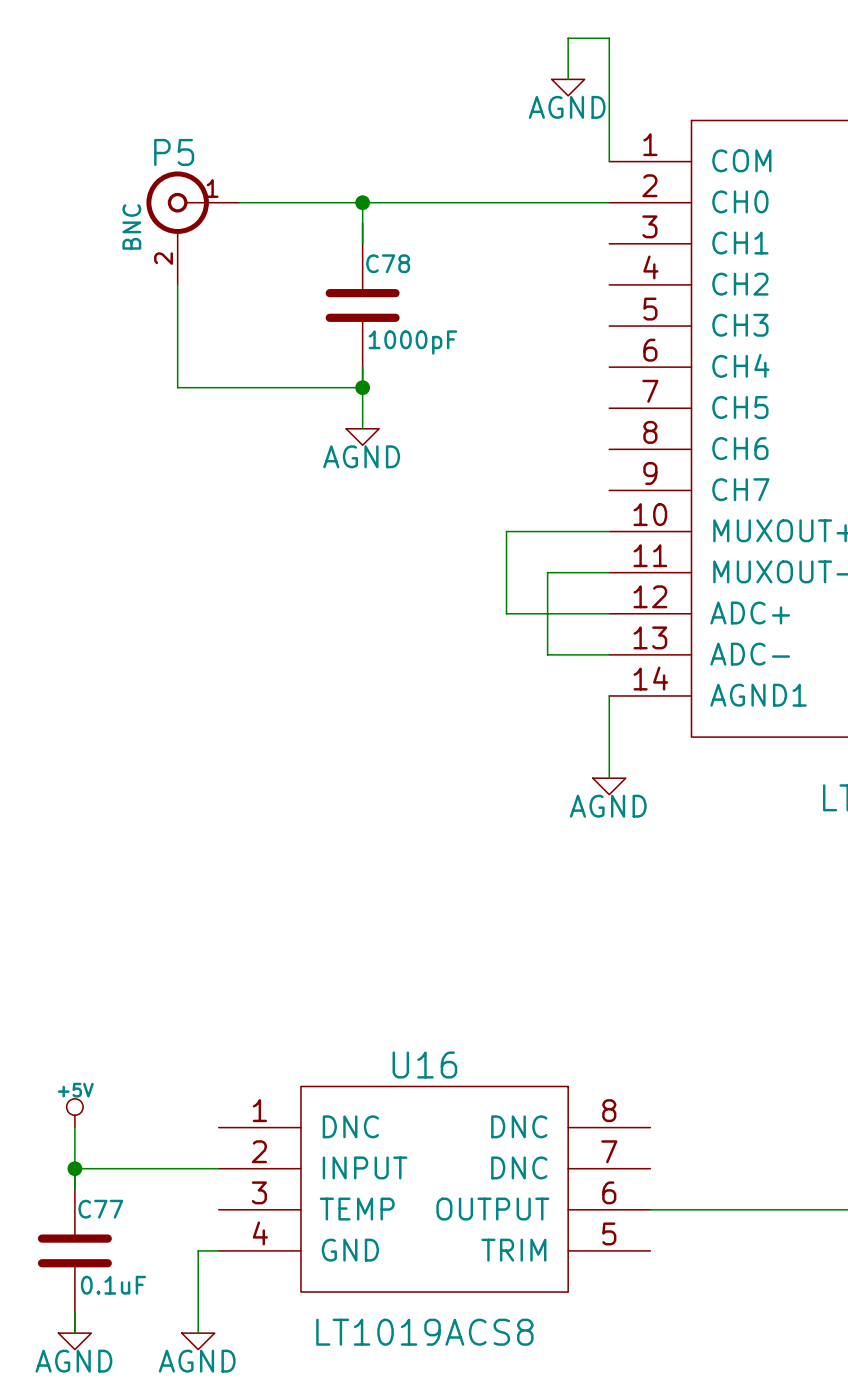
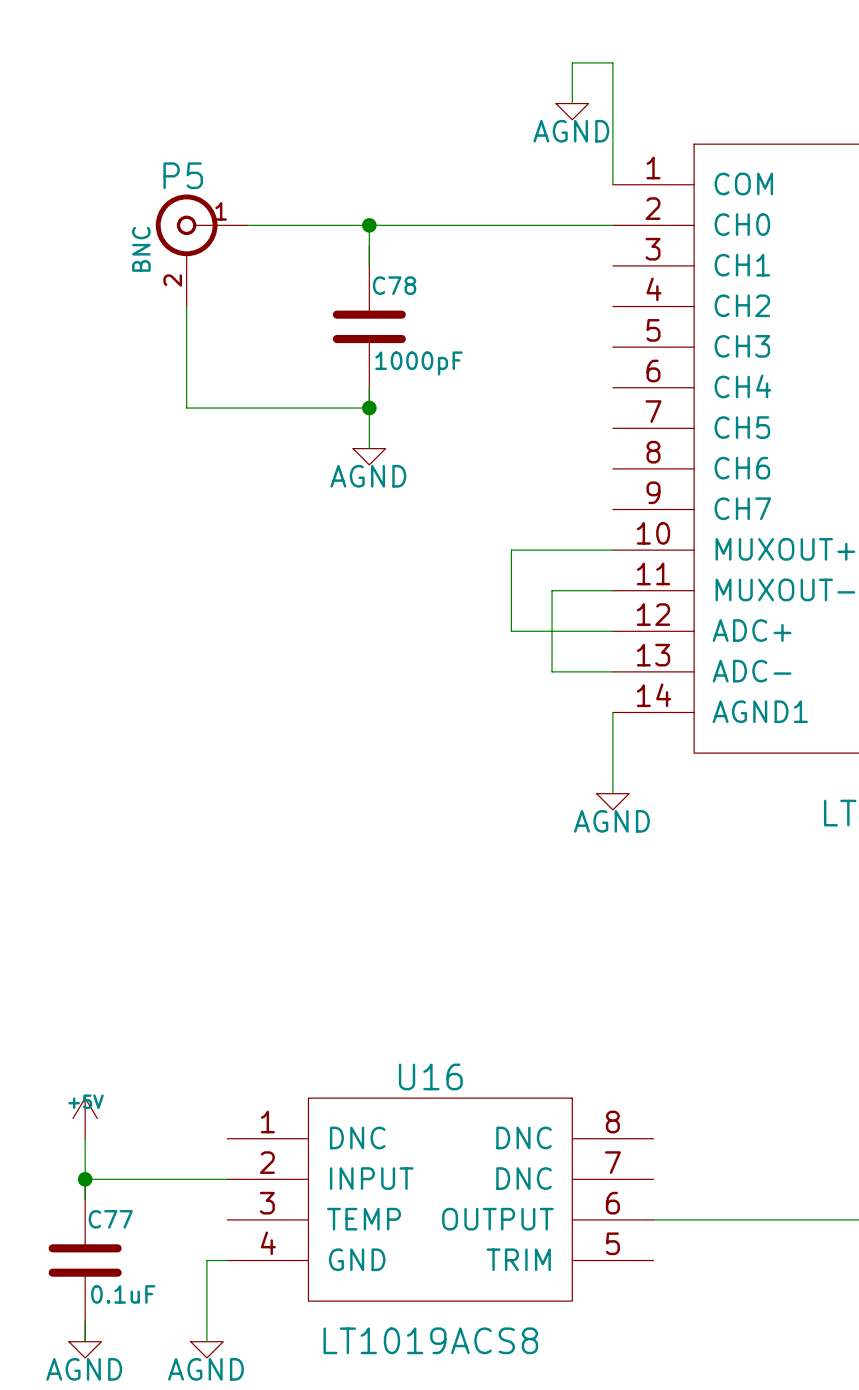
power symbol shape: [66, 1098, 84, 1128] -> [72, 1098, 98, 1139]

